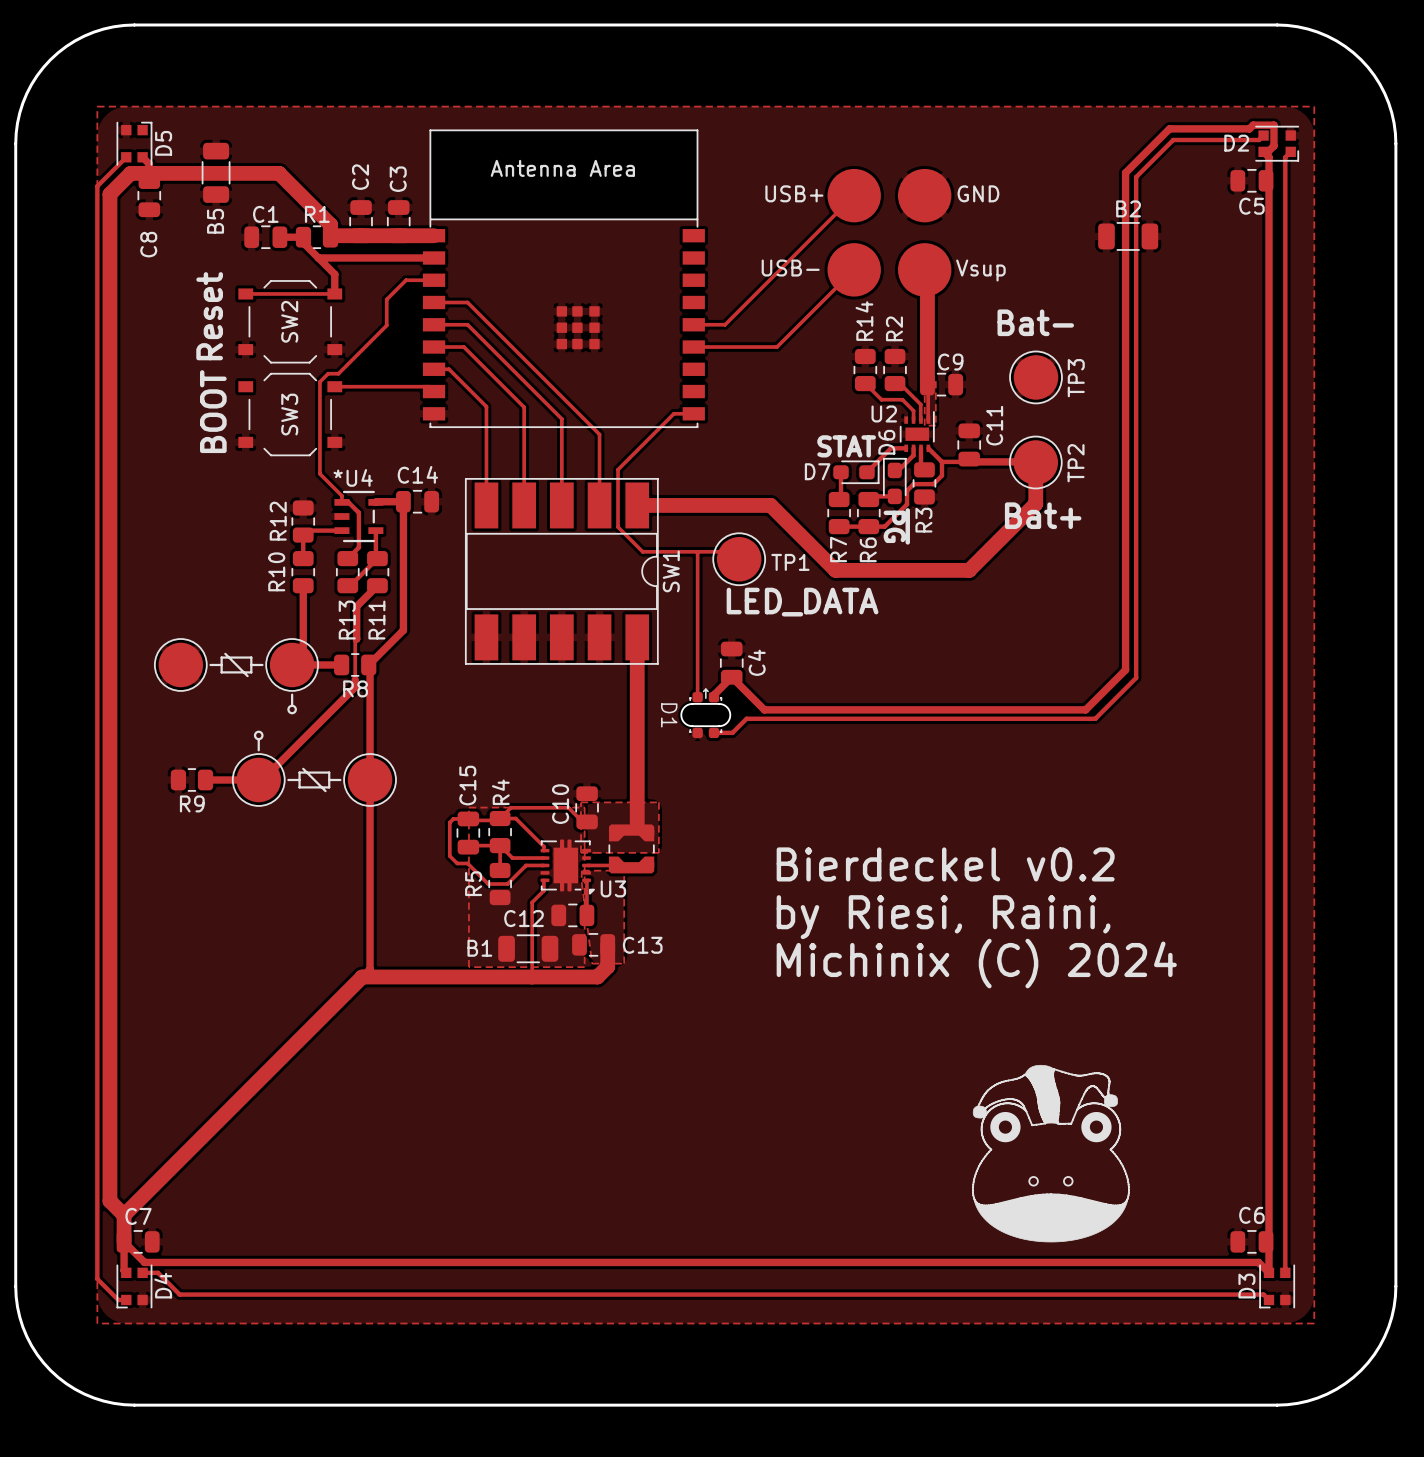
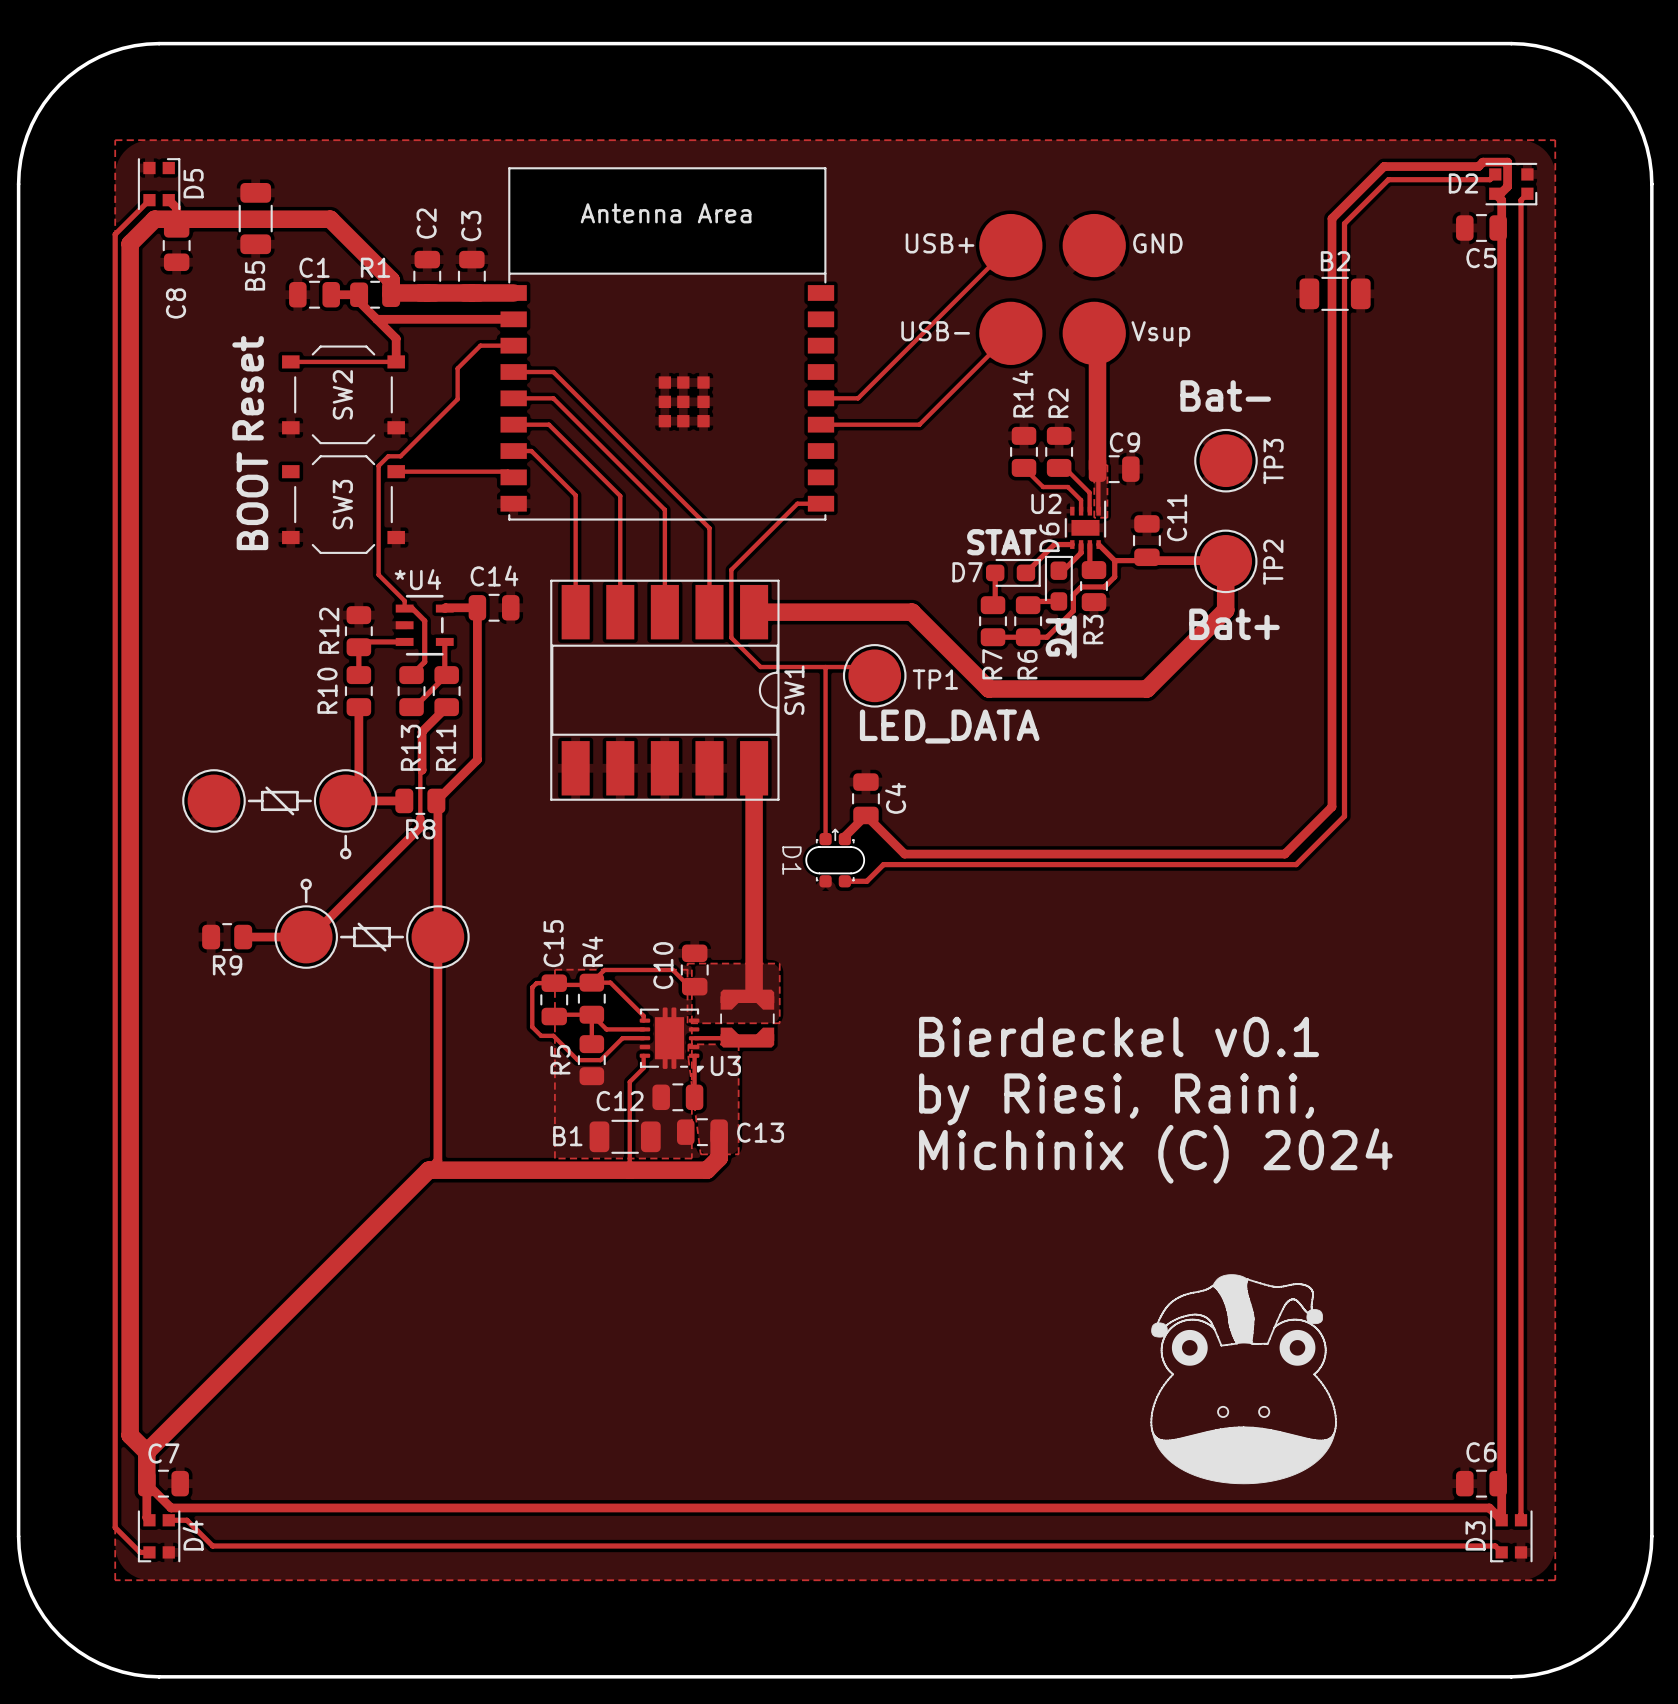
text: Bierdeckel v0.2 (945, 864) -> Bierdeckel v0.1 (1119, 1036)

